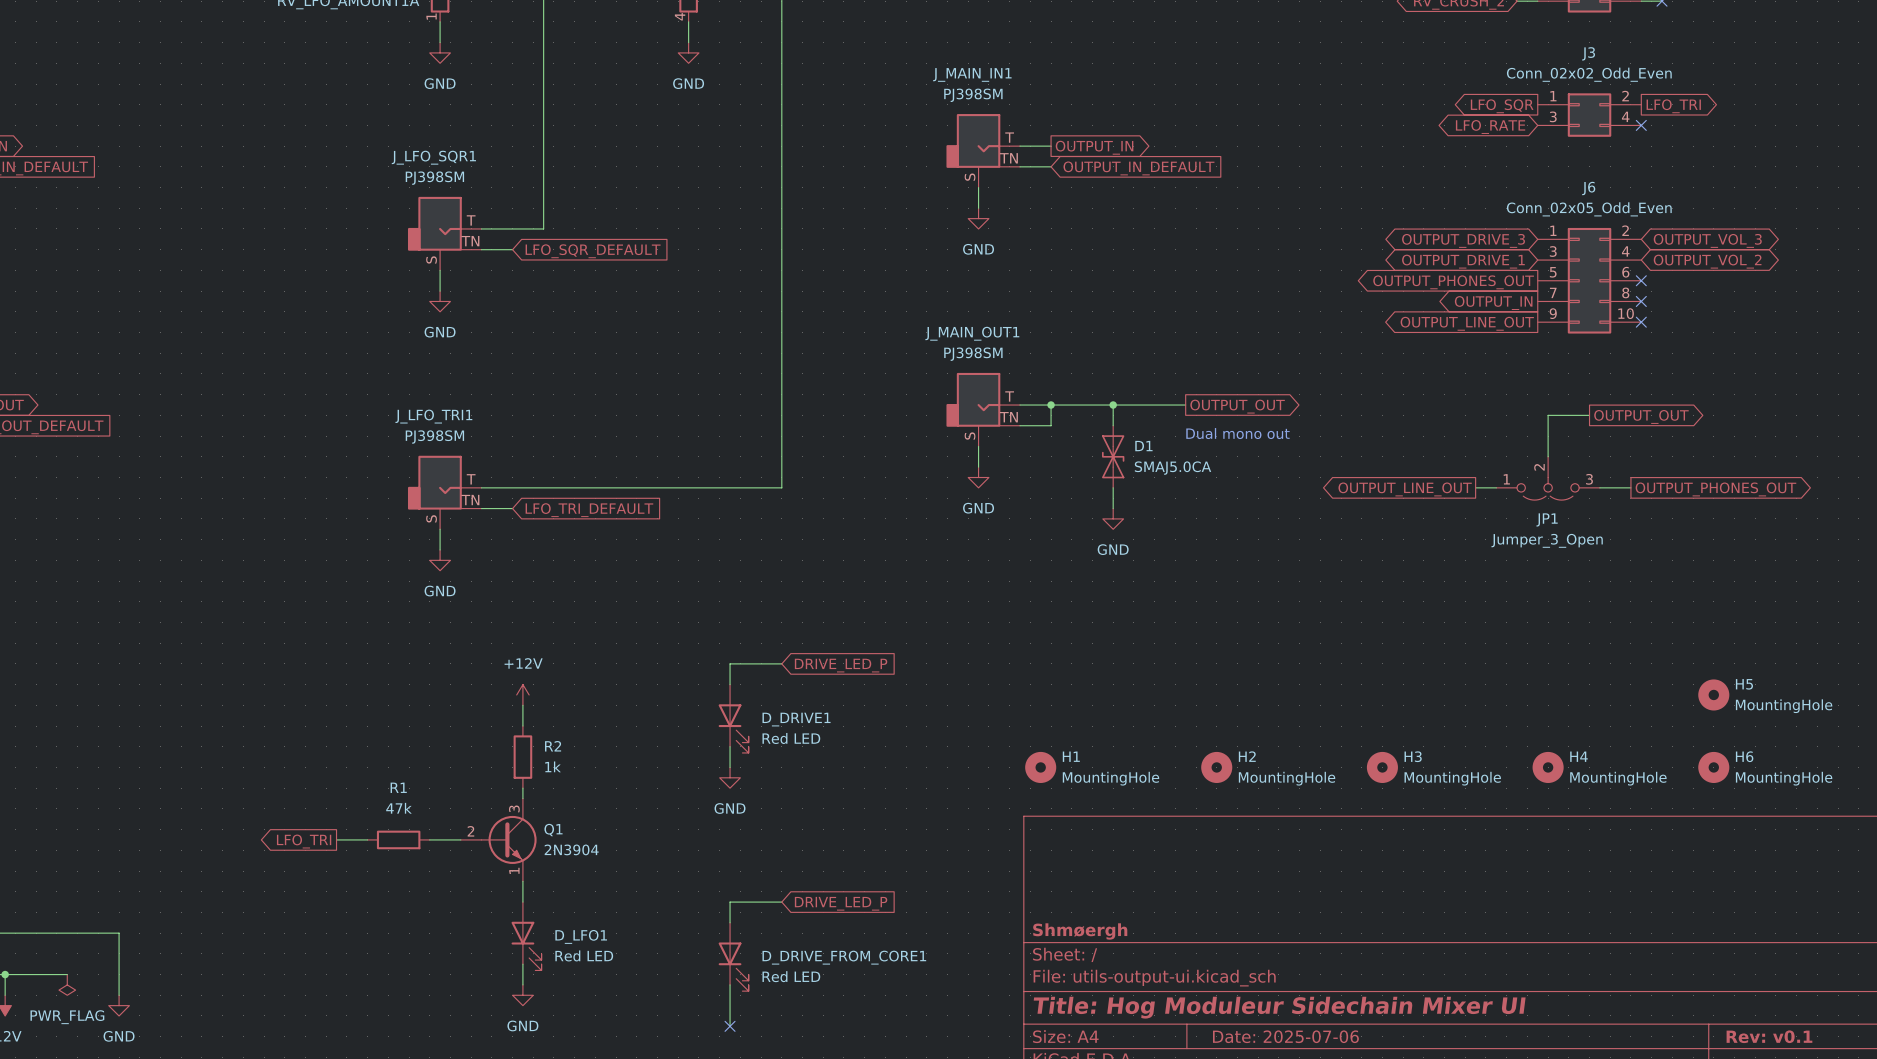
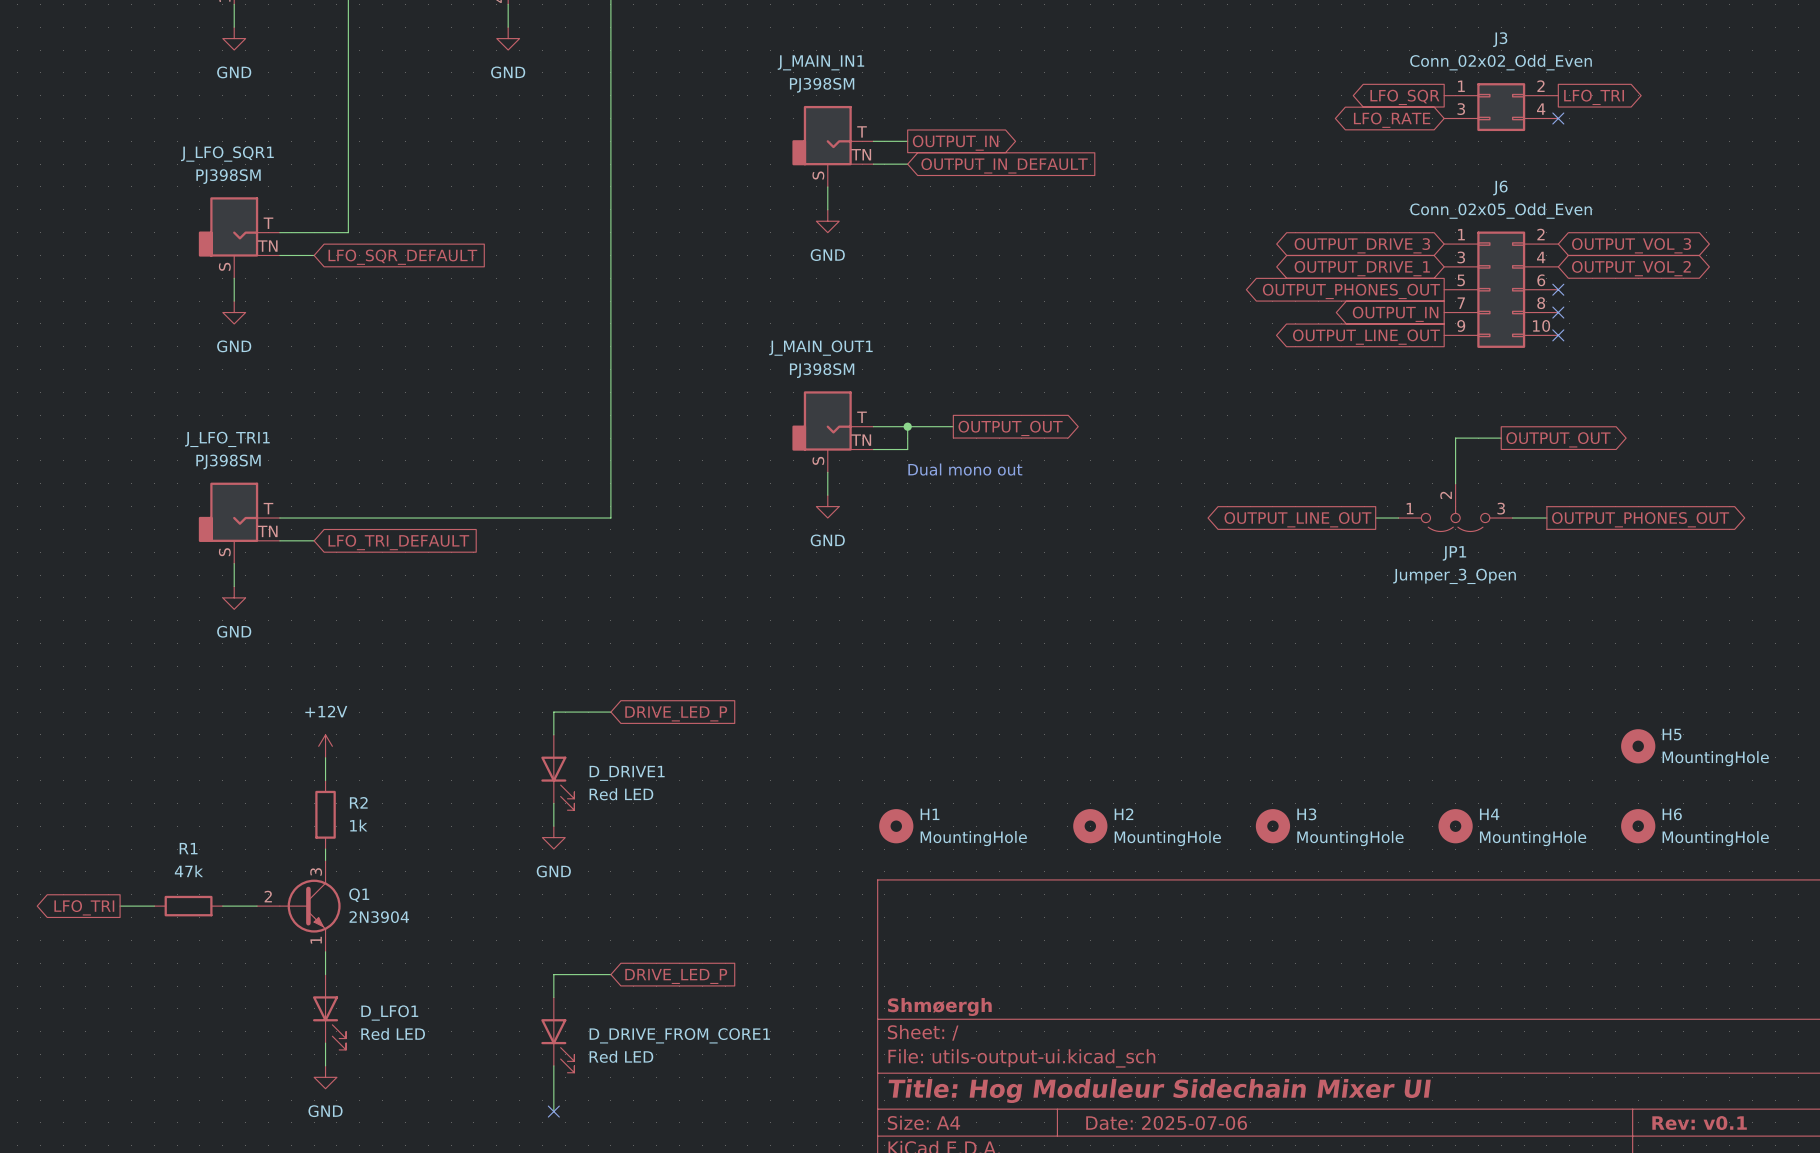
wire: (1092, 405) (1185, 405) -> none
wire: (1113, 405) (1113, 425) -> none
junction: (1113, 405) -> none
global label position: OUTPUT_OUT (1237, 406) -> OUTPUT_OUT (1010, 428)
text position: Dual mono out (1237, 433) -> Dual mono out (965, 469)
D1: SMAJ5.0CA (1113, 456) -> none
wire: (1113, 487) (1113, 508) -> none
power symbol: GND (1113, 518) -> none

